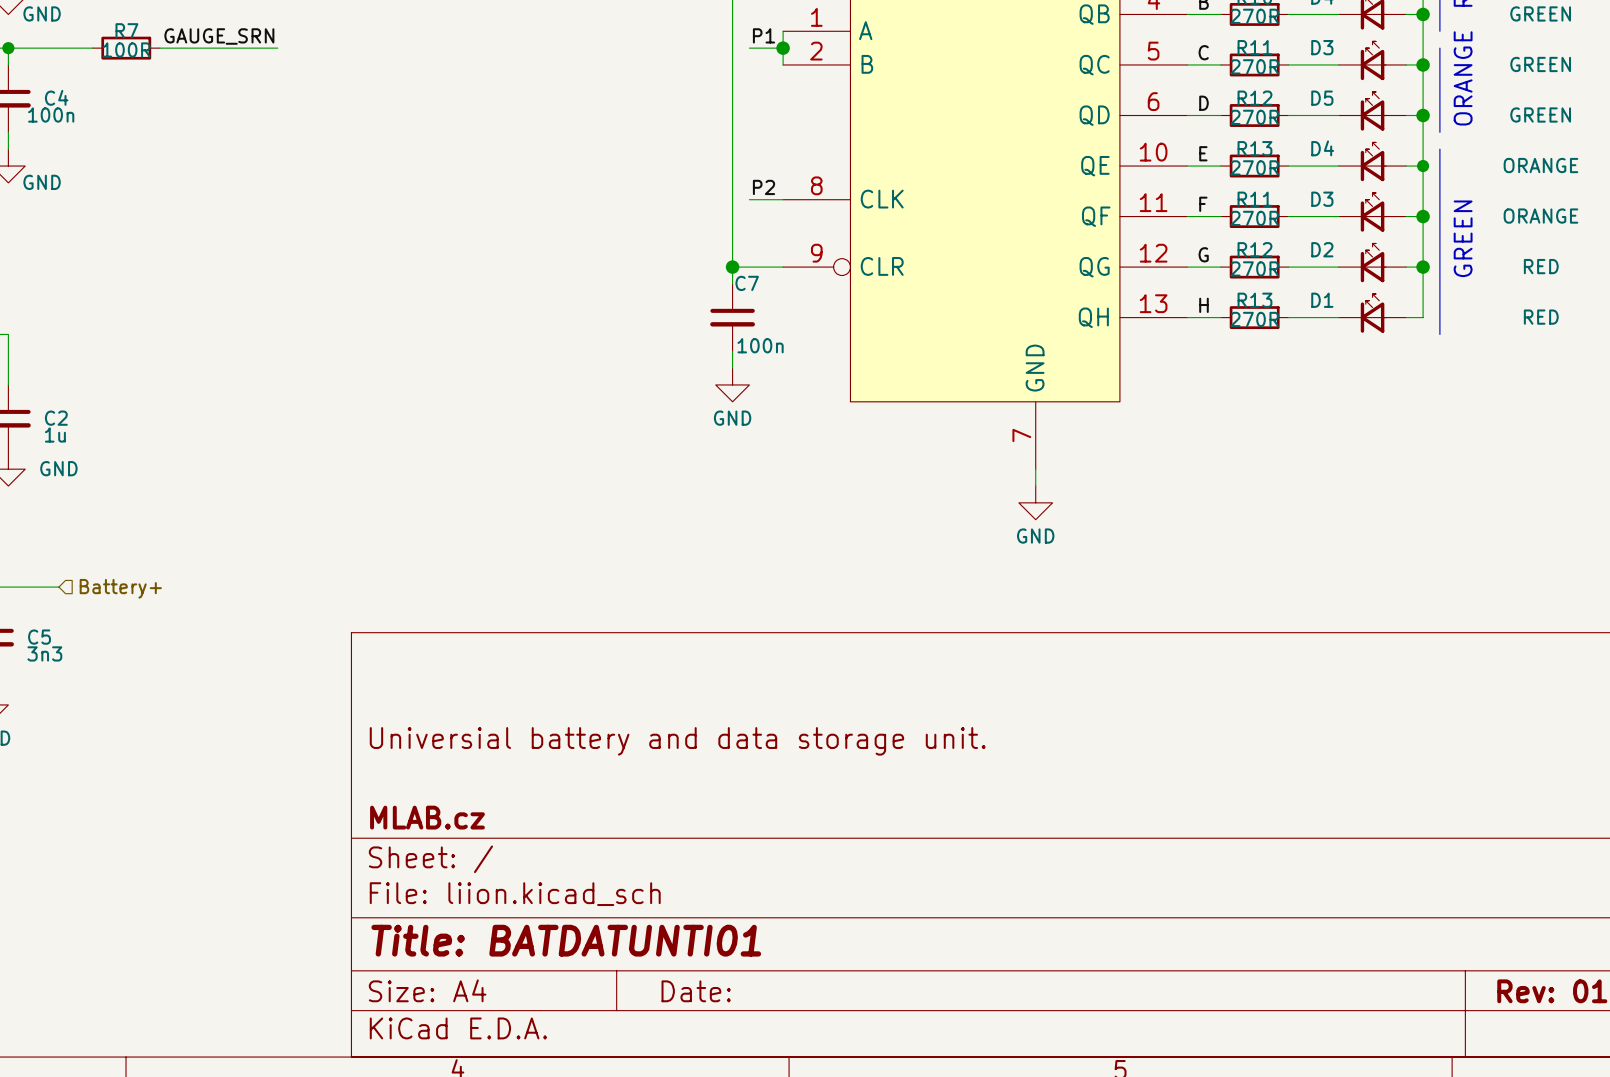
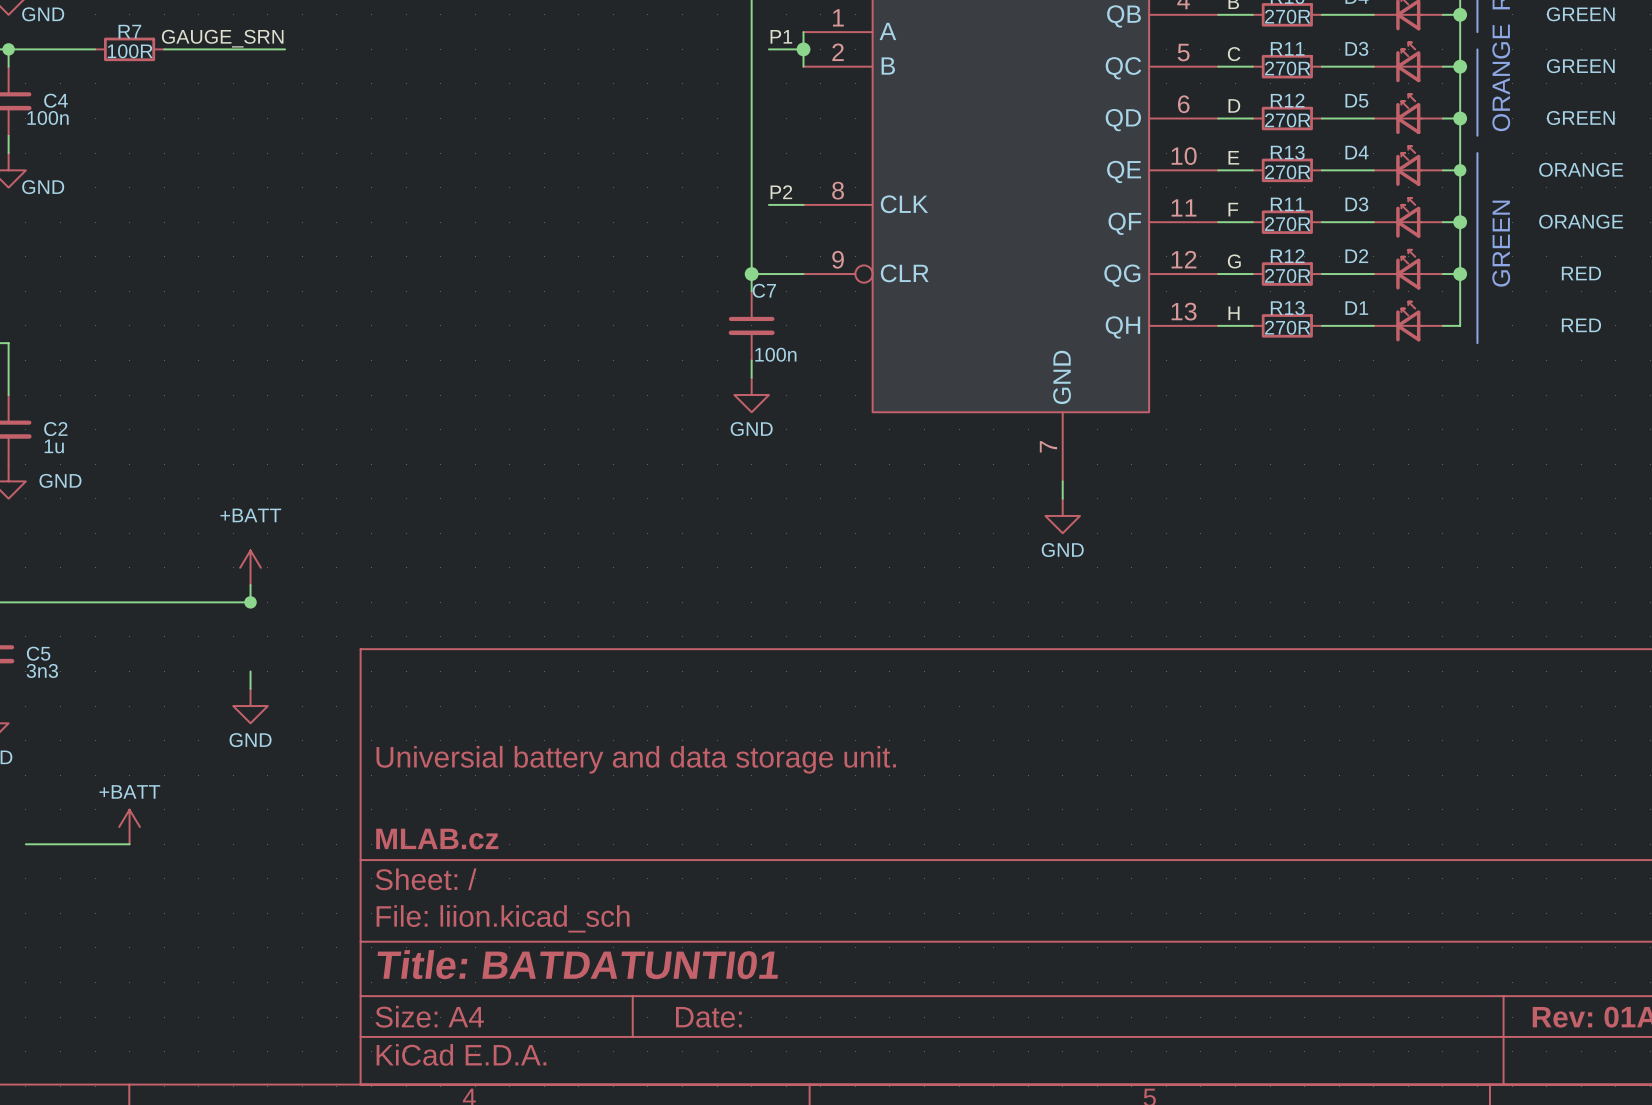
power symbol: none -> +BATT (250, 567)
wire: none -> (250, 585) (250, 602) (60, 602)
junction: none -> (250, 602)
hierarchical label: Battery+ (120, 588) -> none
wire: none -> (250, 671) (250, 688)
power symbol: none -> GND (250, 706)
power symbol: none -> +BATT (129, 827)
wire: none -> (25, 844) (129, 844)

